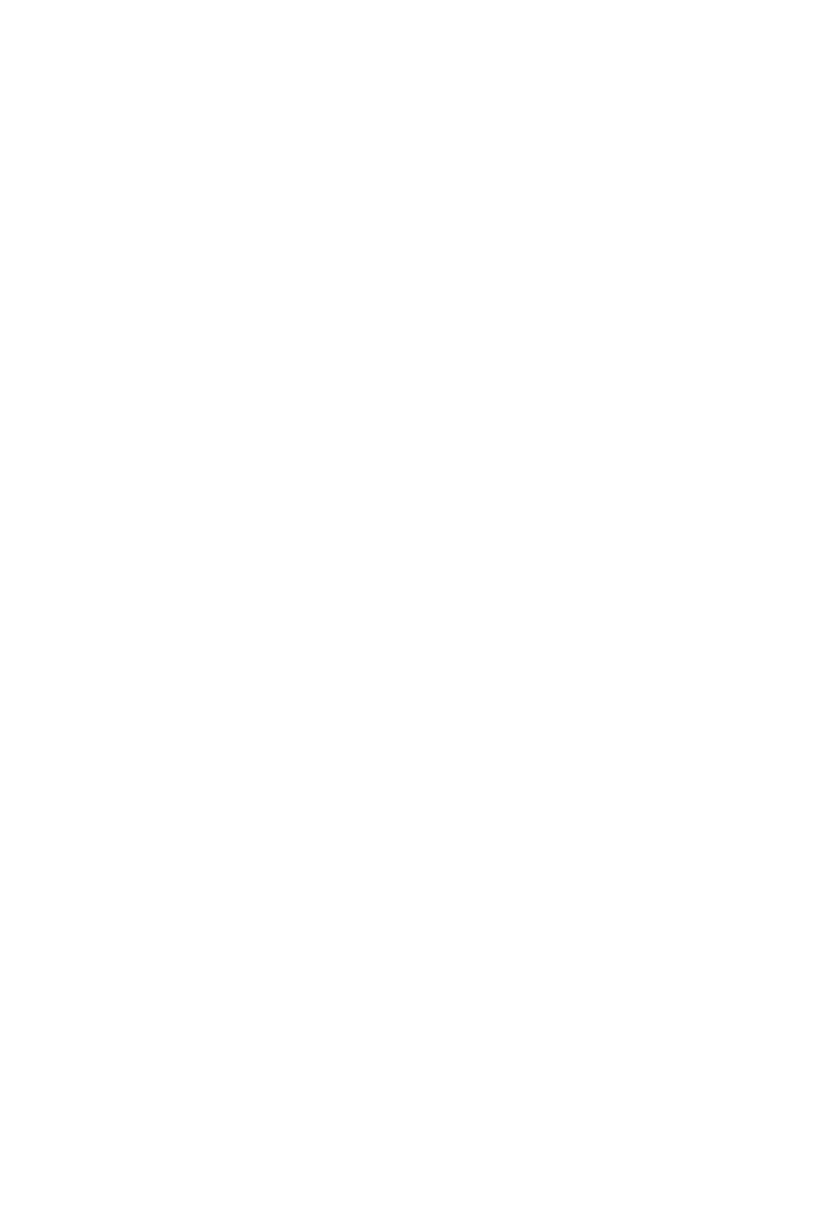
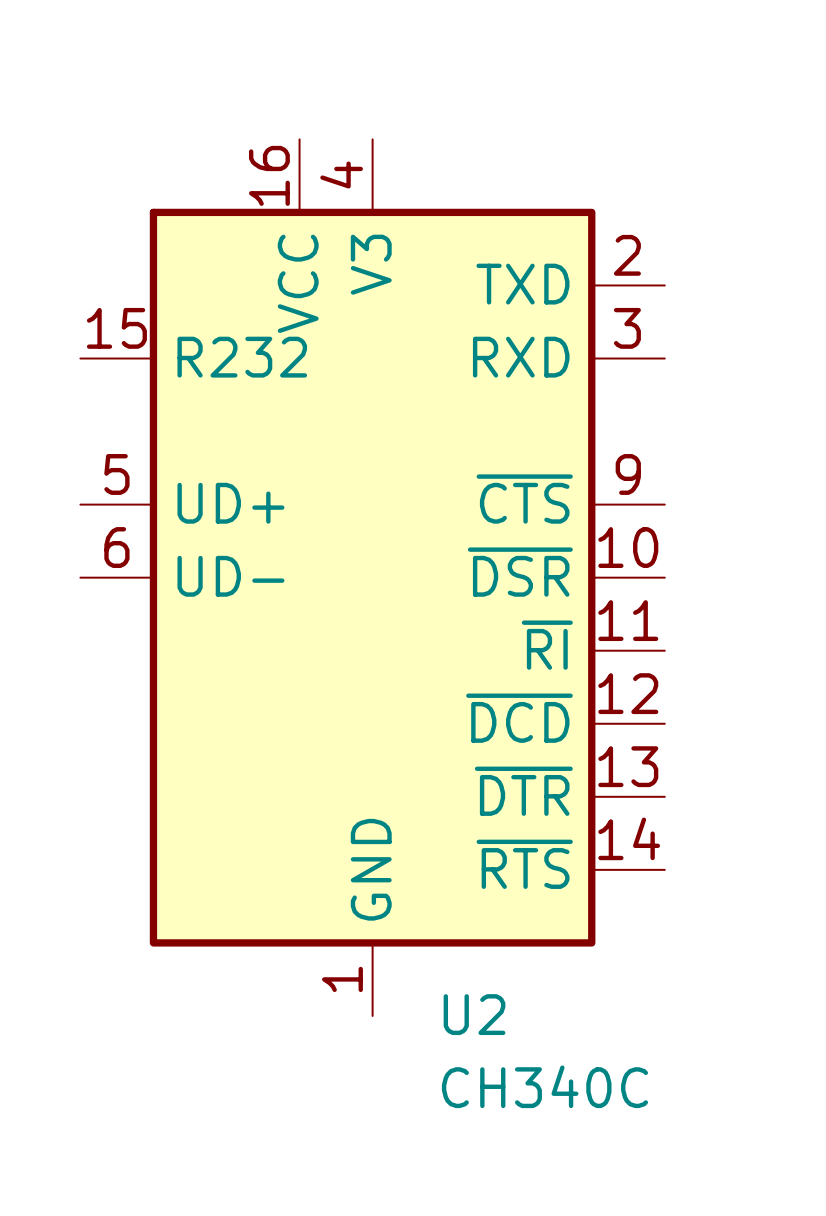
U2: none -> CH340C (372, 577)

